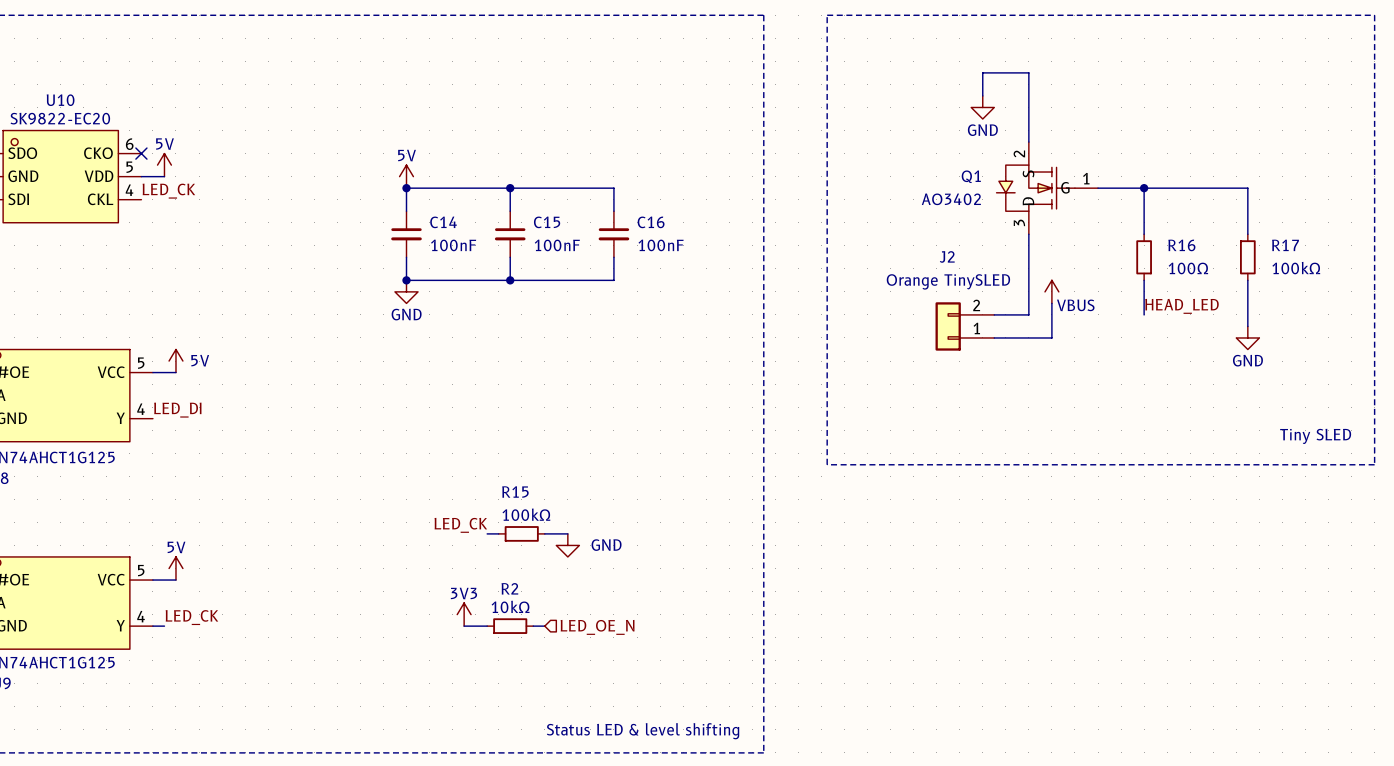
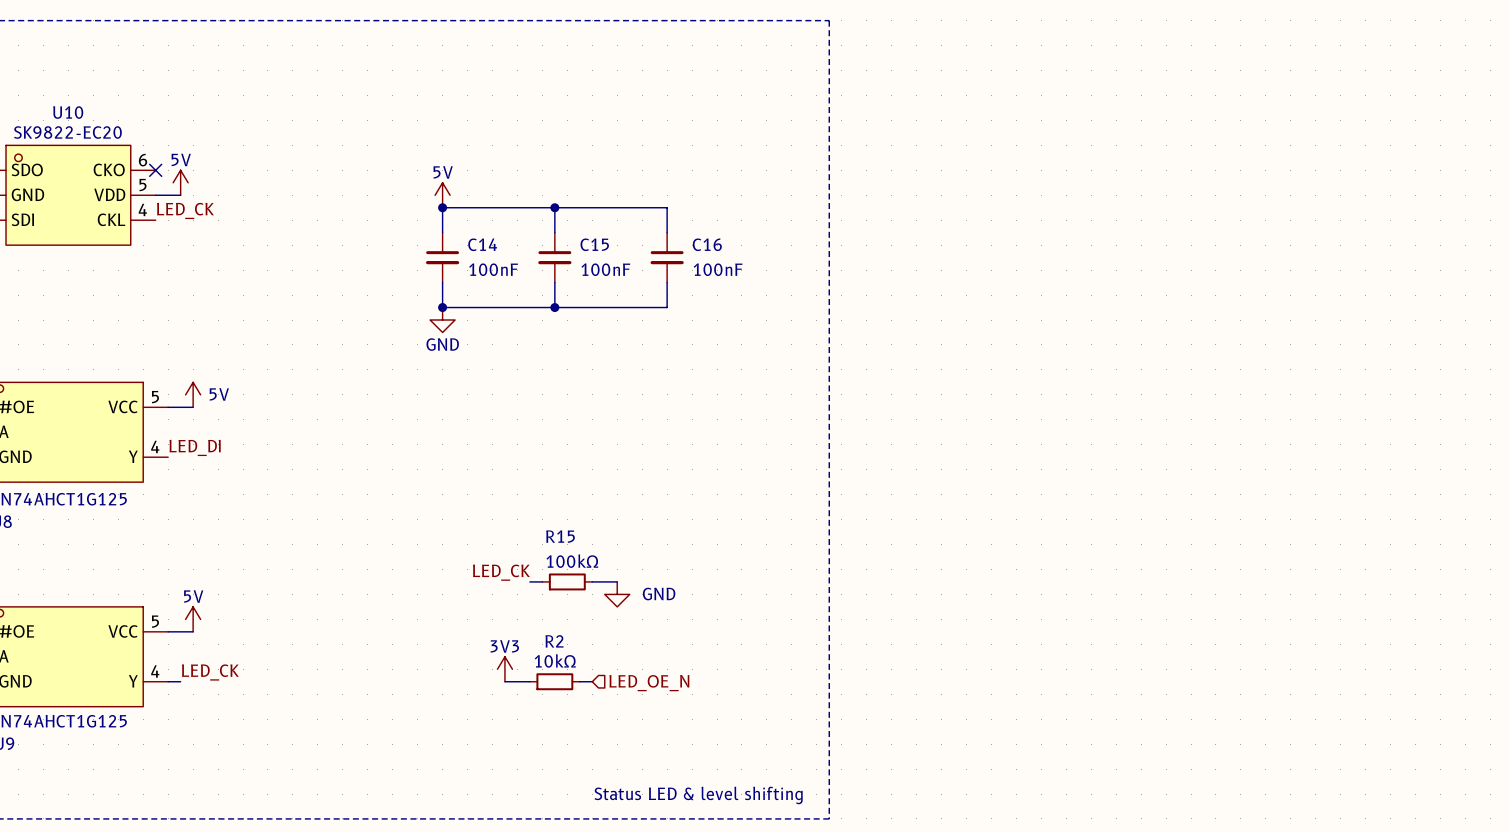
line: (827, 15) (1374, 15) (1374, 464) (827, 464) (827, 15) -> none
wire: (982, 95) (982, 72) (1028, 72) (1028, 142) -> none
power symbol: GND (982, 107) -> none
Q1: AO3402 (1047, 188) -> none
wire: (1098, 188) (1247, 188) (1247, 234) -> none
wire: (1144, 188) (1144, 234) -> none
junction: (1144, 188) -> none
wire: (1028, 234) (1028, 314) (994, 314) -> none
R16: 100Ω (1144, 257) -> none
R17: 100kΩ (1247, 257) -> none
wire: (1144, 280) (1144, 314) -> none
wire: (1247, 280) (1247, 326) -> none
power symbol: VBUS (1051, 291) -> none
wire: (1051, 303) (1051, 337) (994, 337) -> none
label: HEAD_LED (1181, 306) -> none
J2: Orange TinySLED (964, 326) -> none
power symbol: GND (1247, 337) -> none
text: Tiny SLED (1315, 436) -> none

